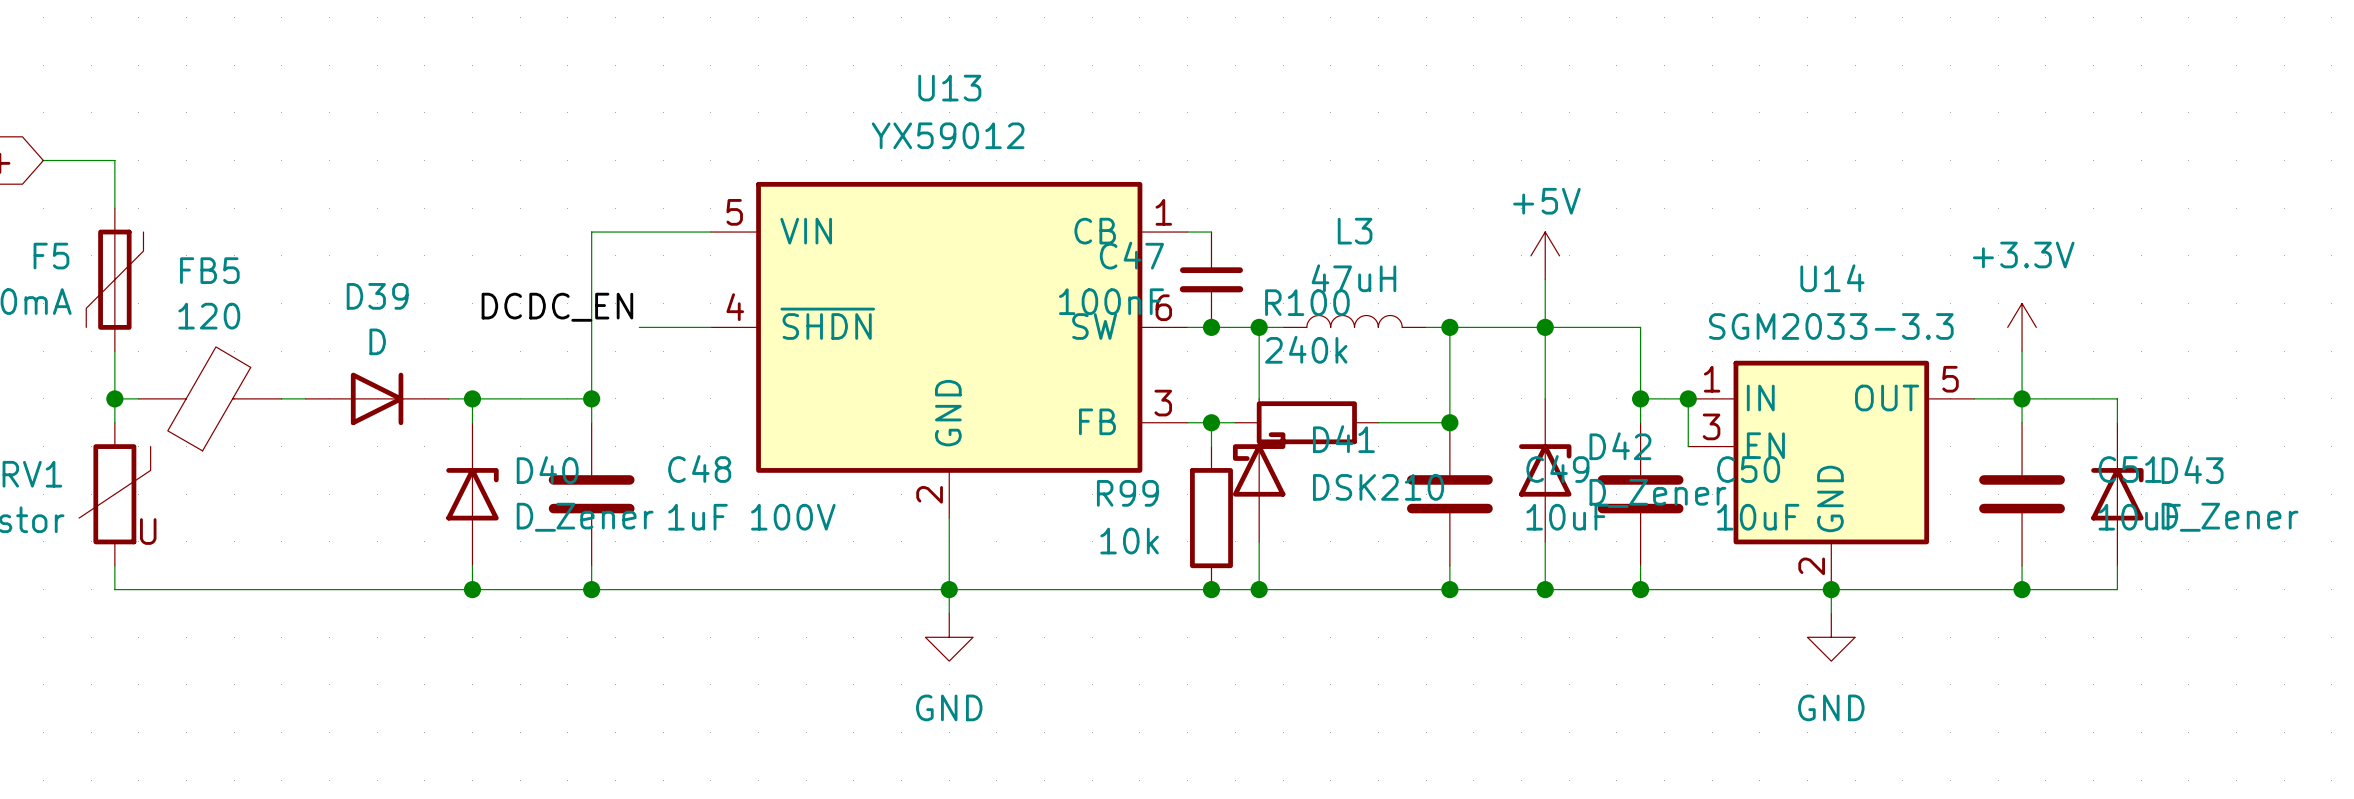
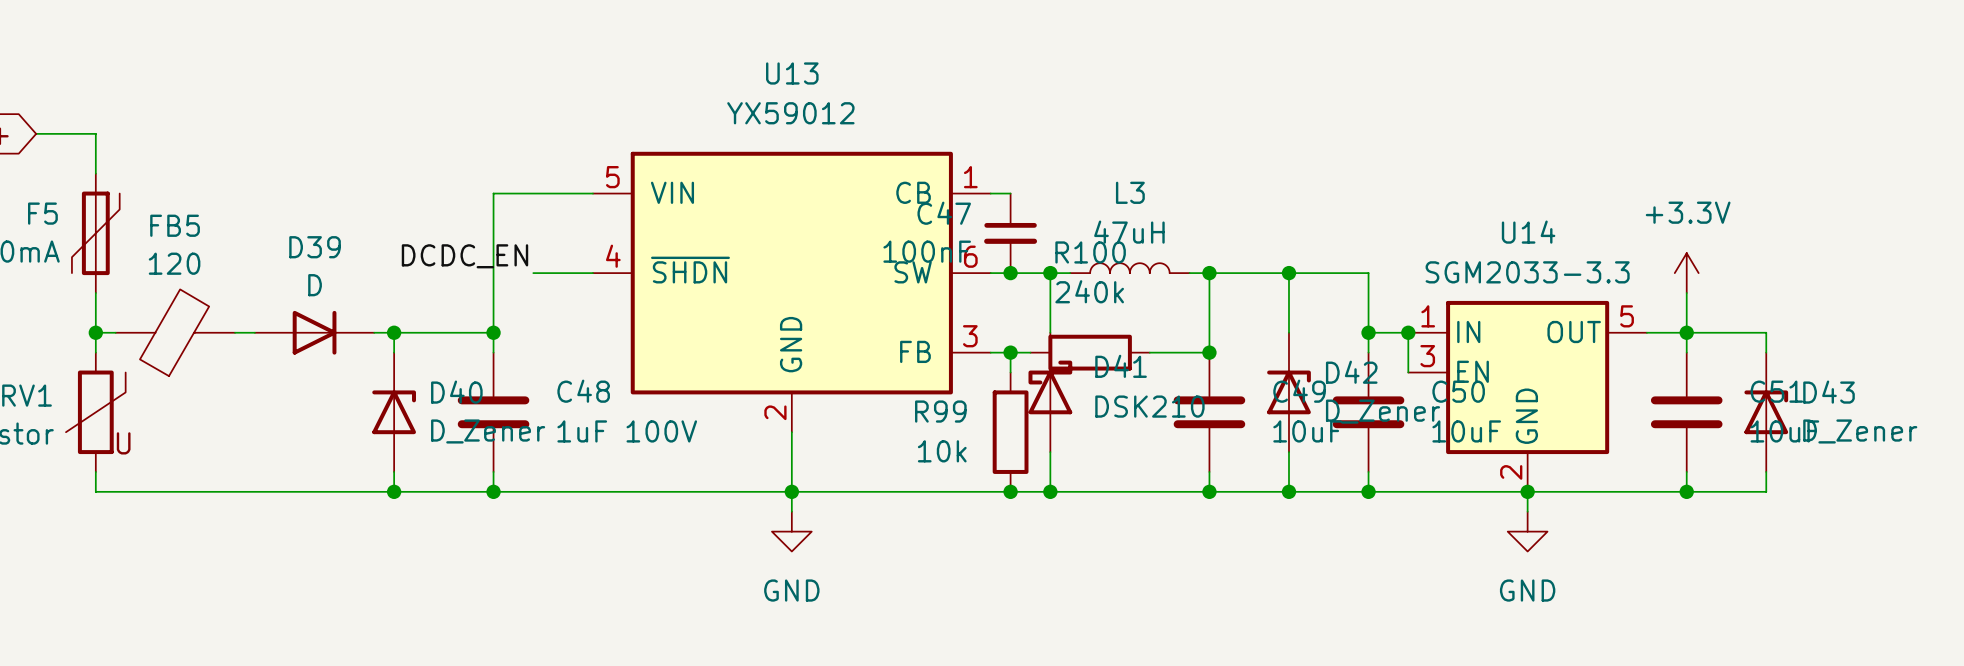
power symbol: +5V (1545, 255) -> none
wire: (1545, 279) (1545, 327) -> none

